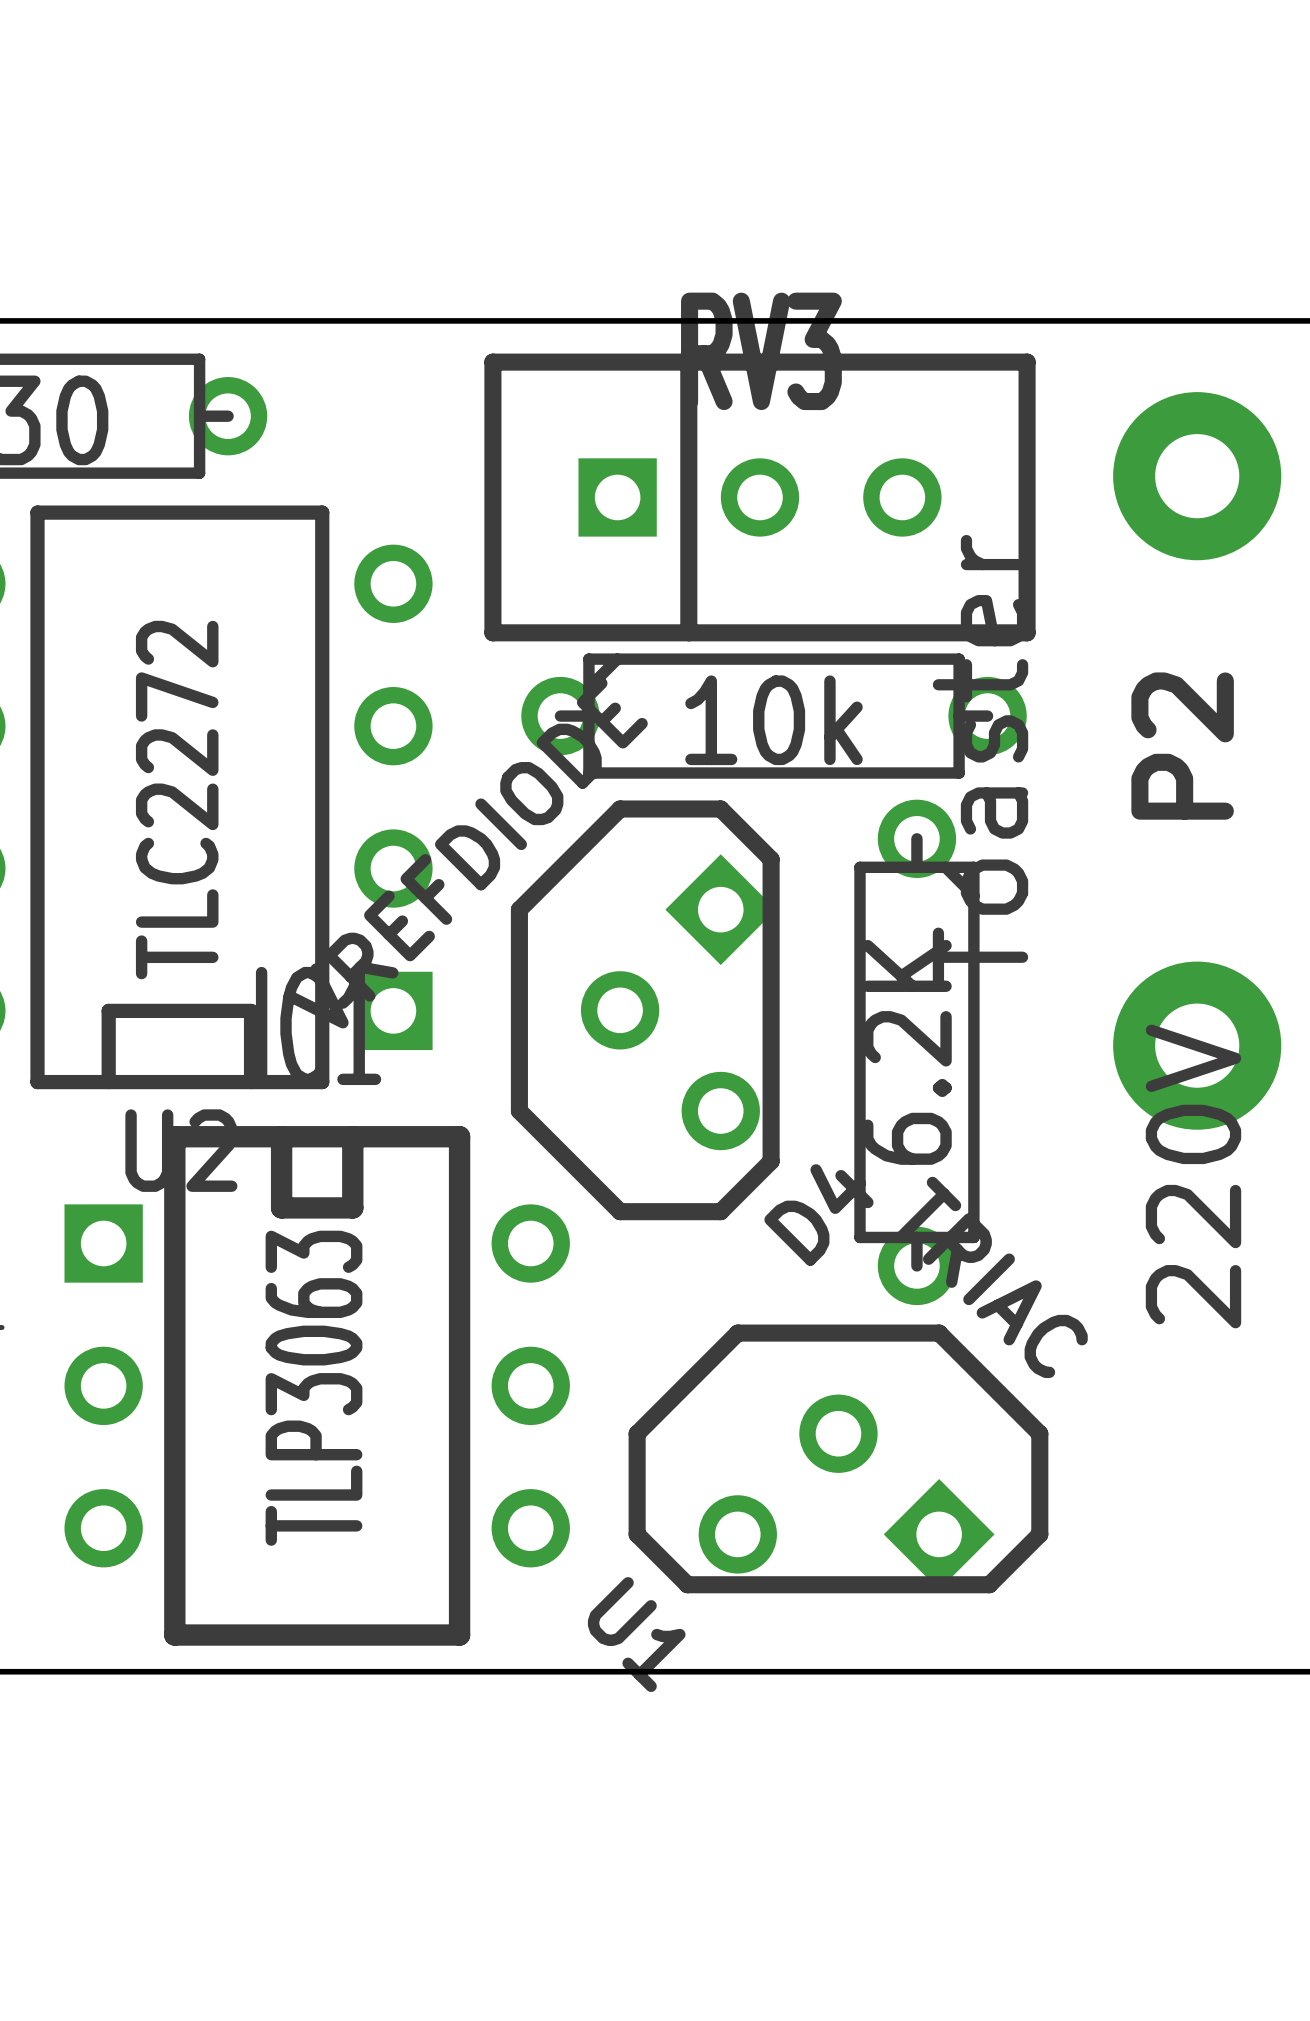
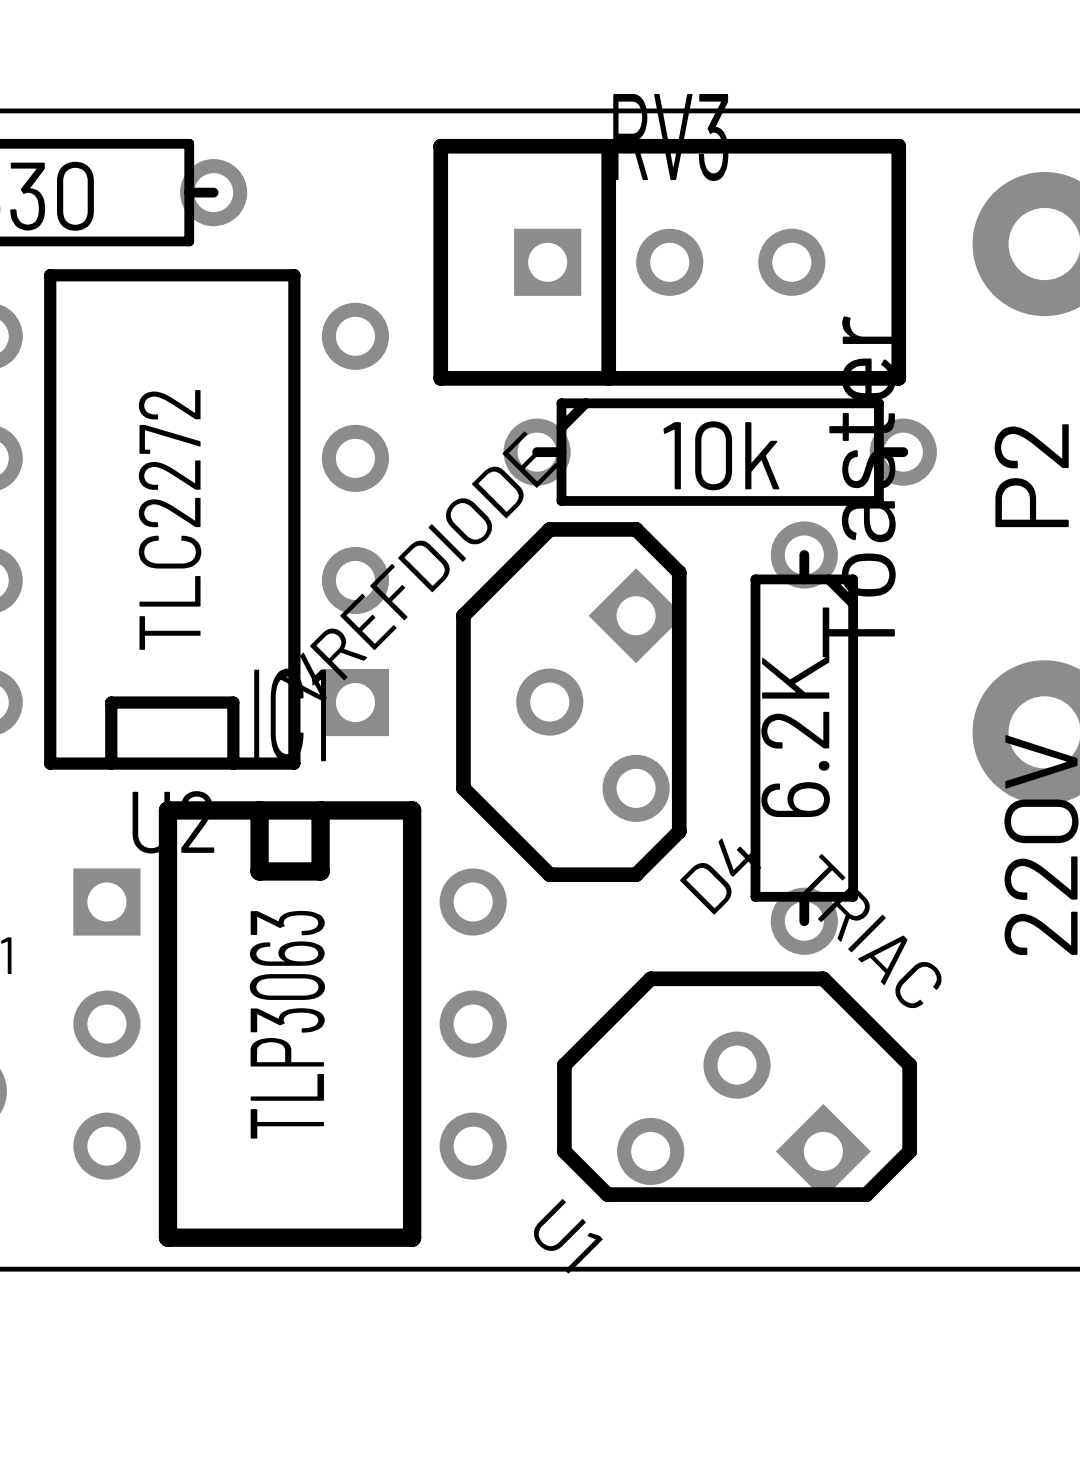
part position: (774, 716) -> (720, 452)

